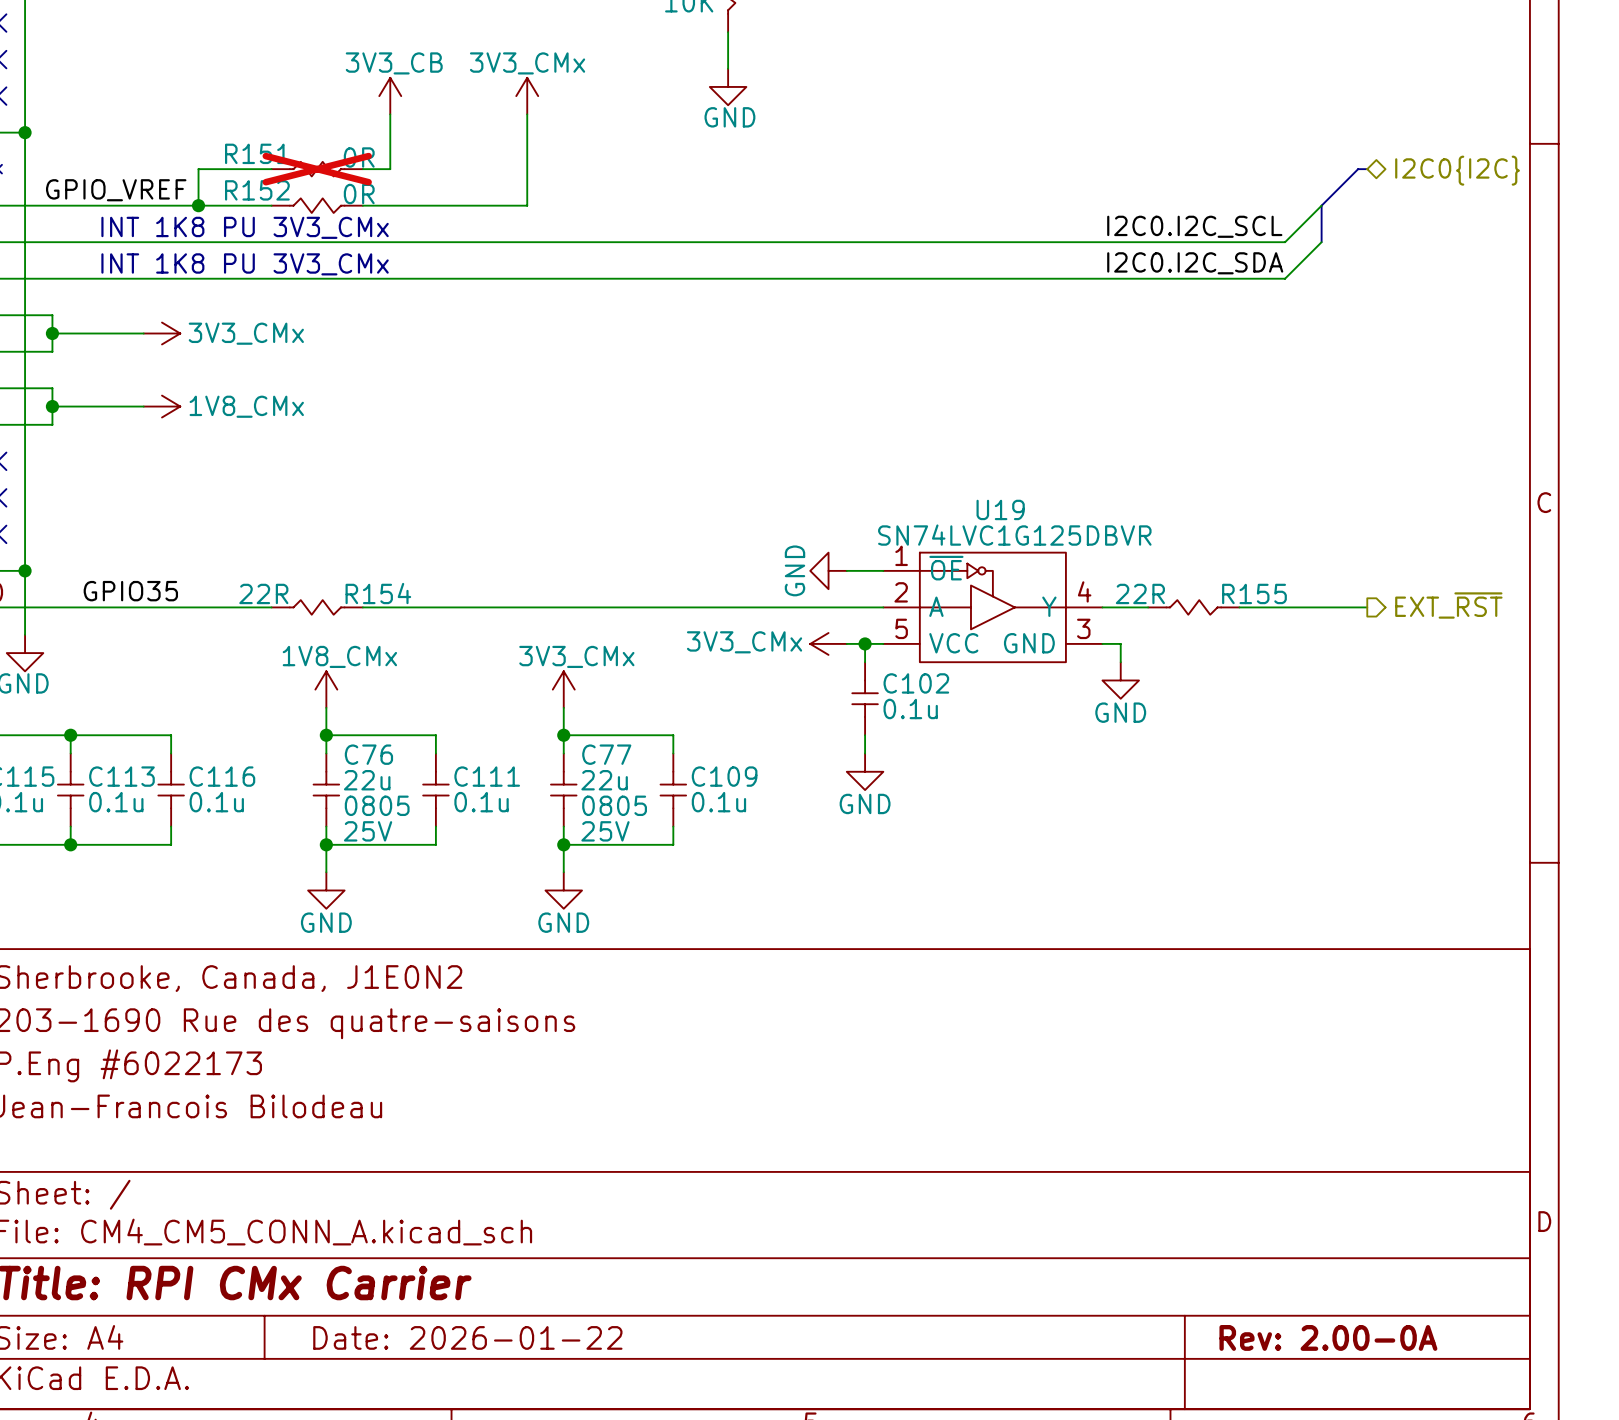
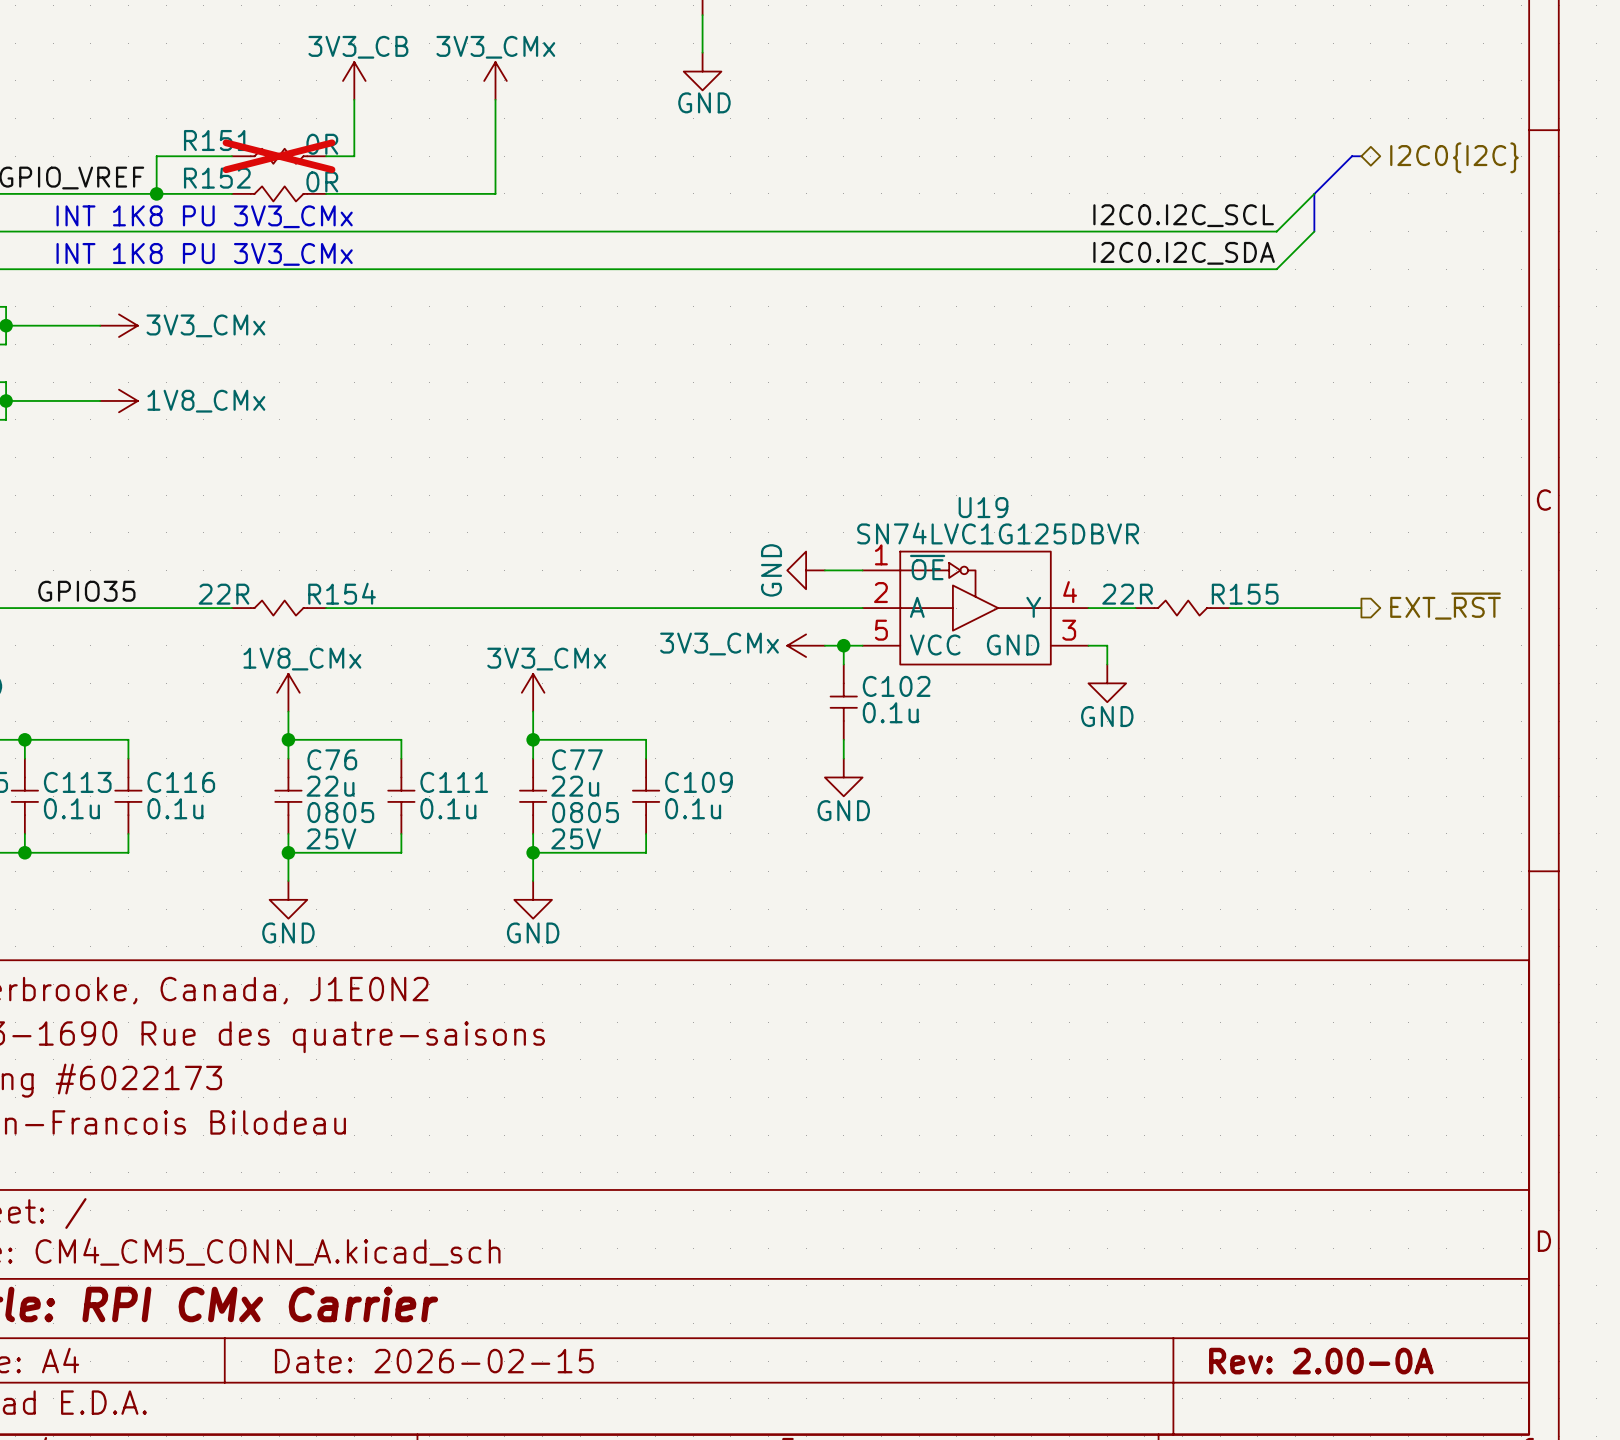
title block: Date: 2026-01-22 (467, 1337) -> Date: 2026-02-15 (434, 1361)

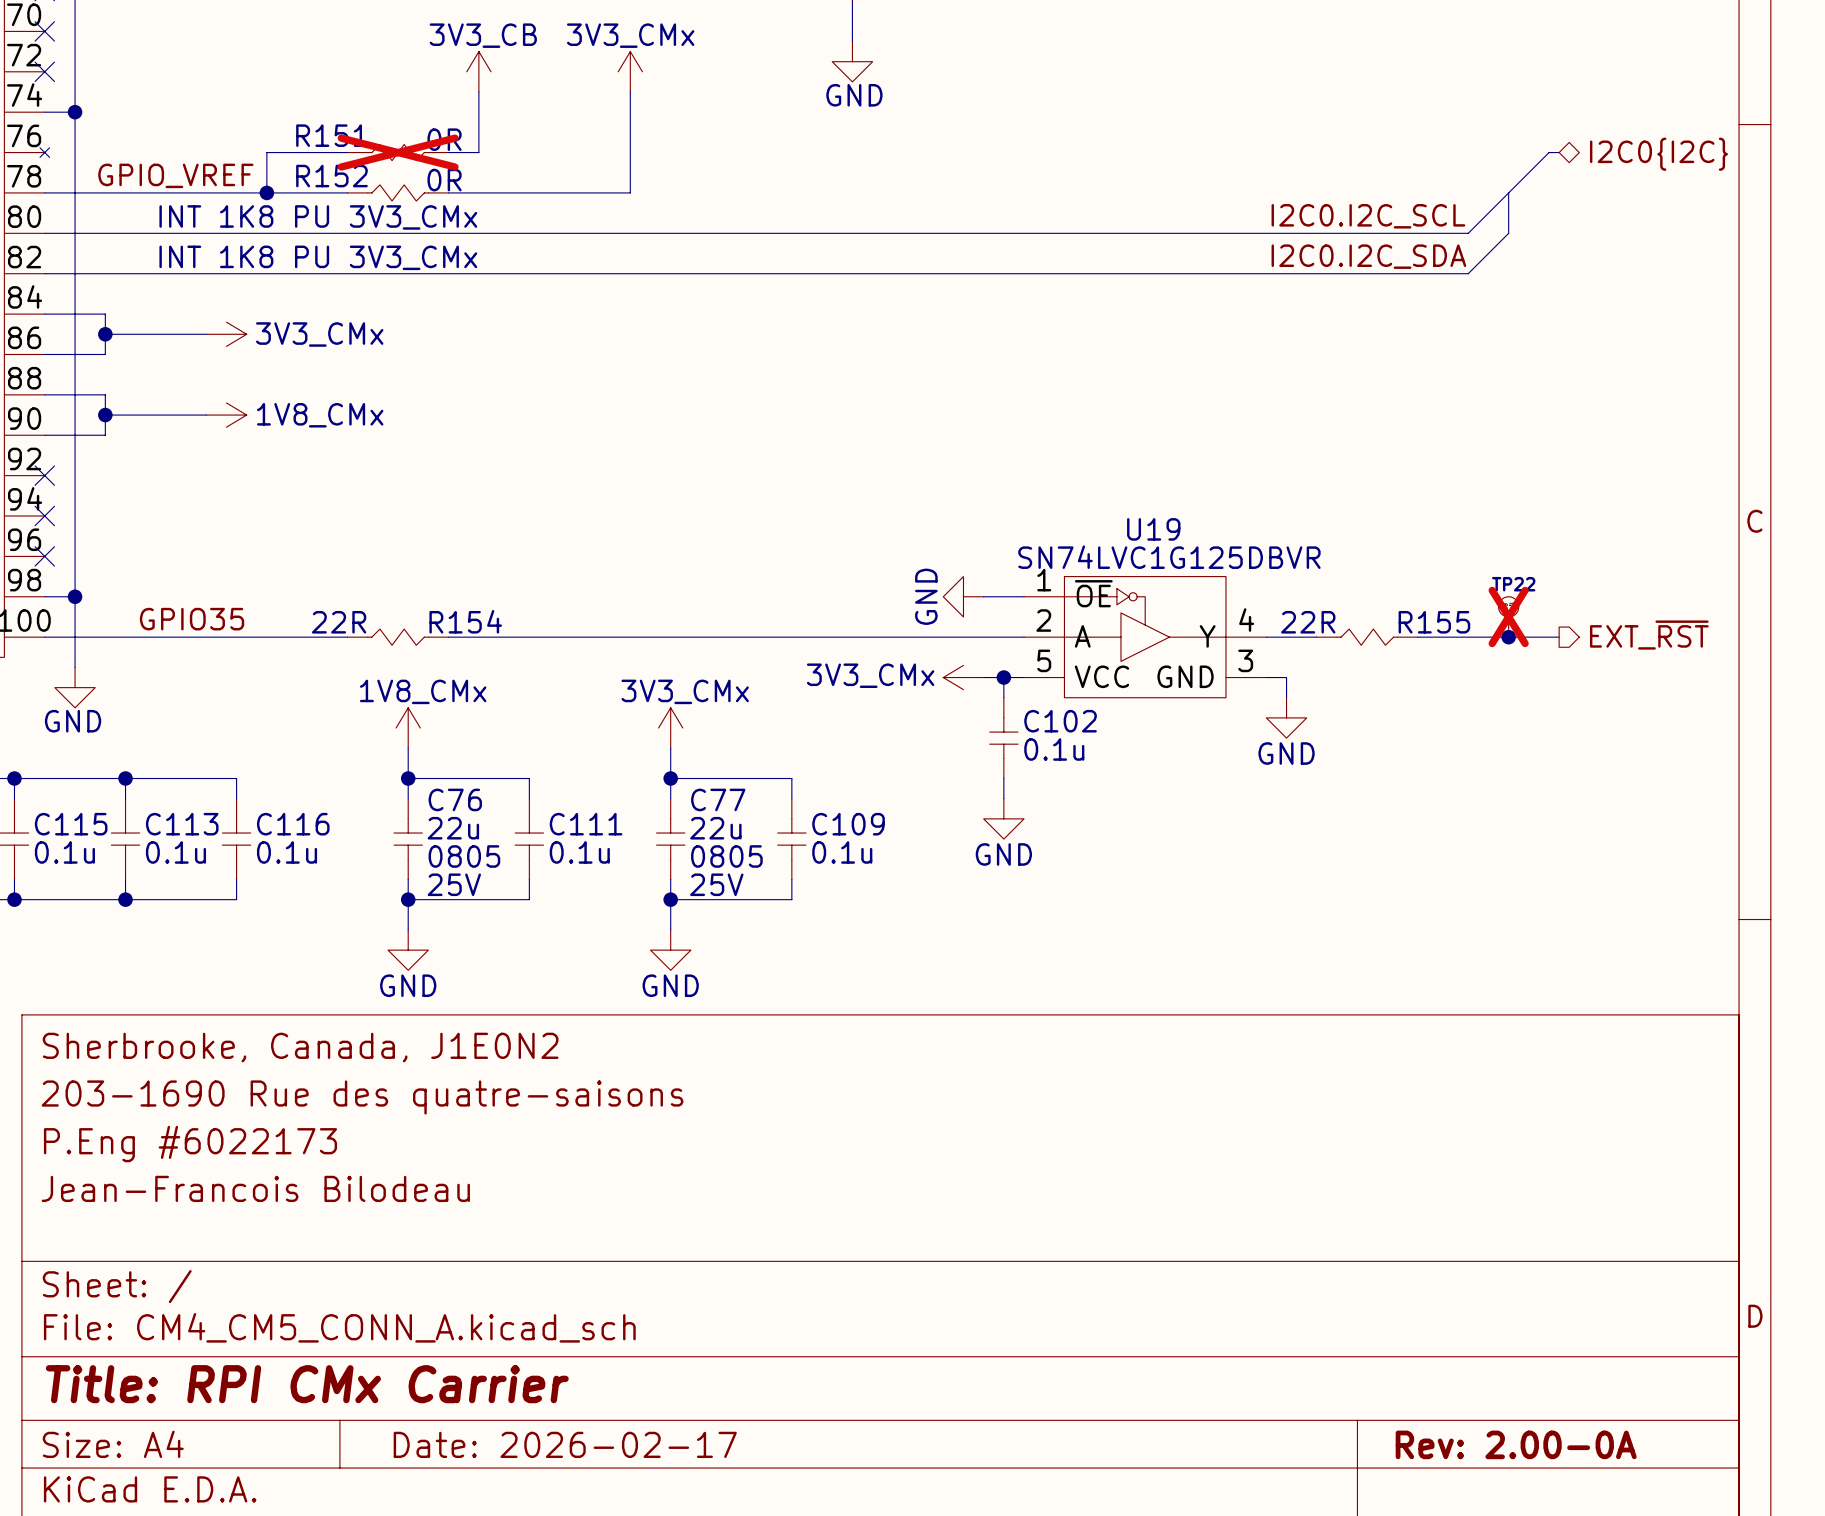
TP22: none -> (1508, 616)
junction: none -> (1508, 637)
title block: Date: 2026-02-15 (434, 1361) -> Date: 2026-02-17 (565, 1444)

